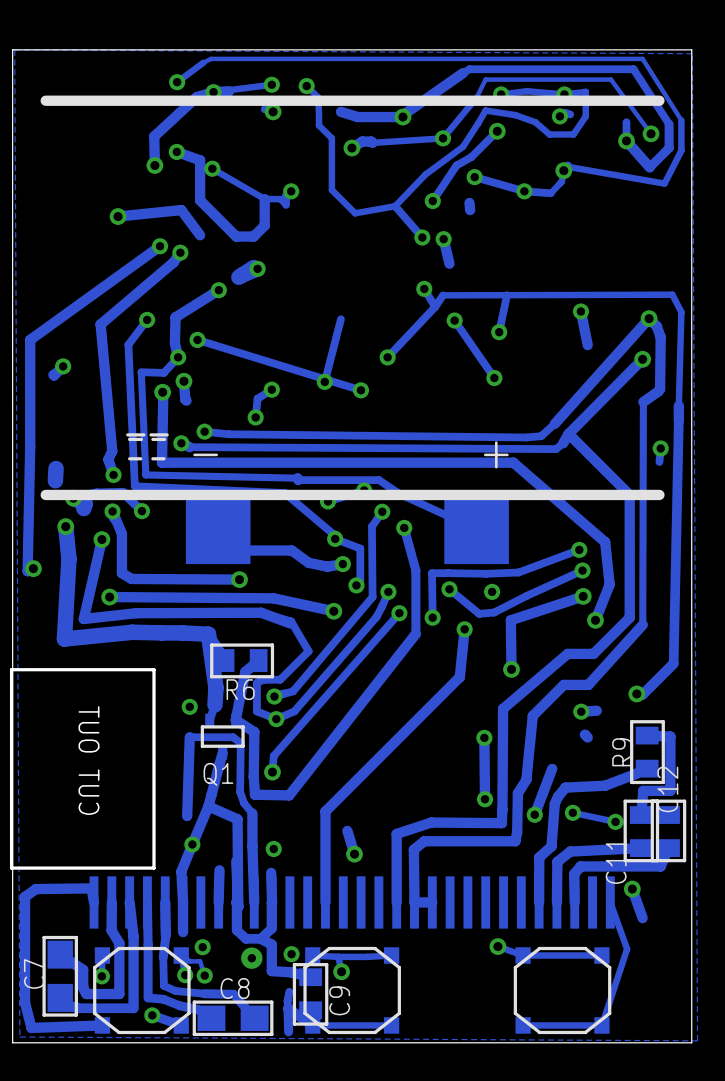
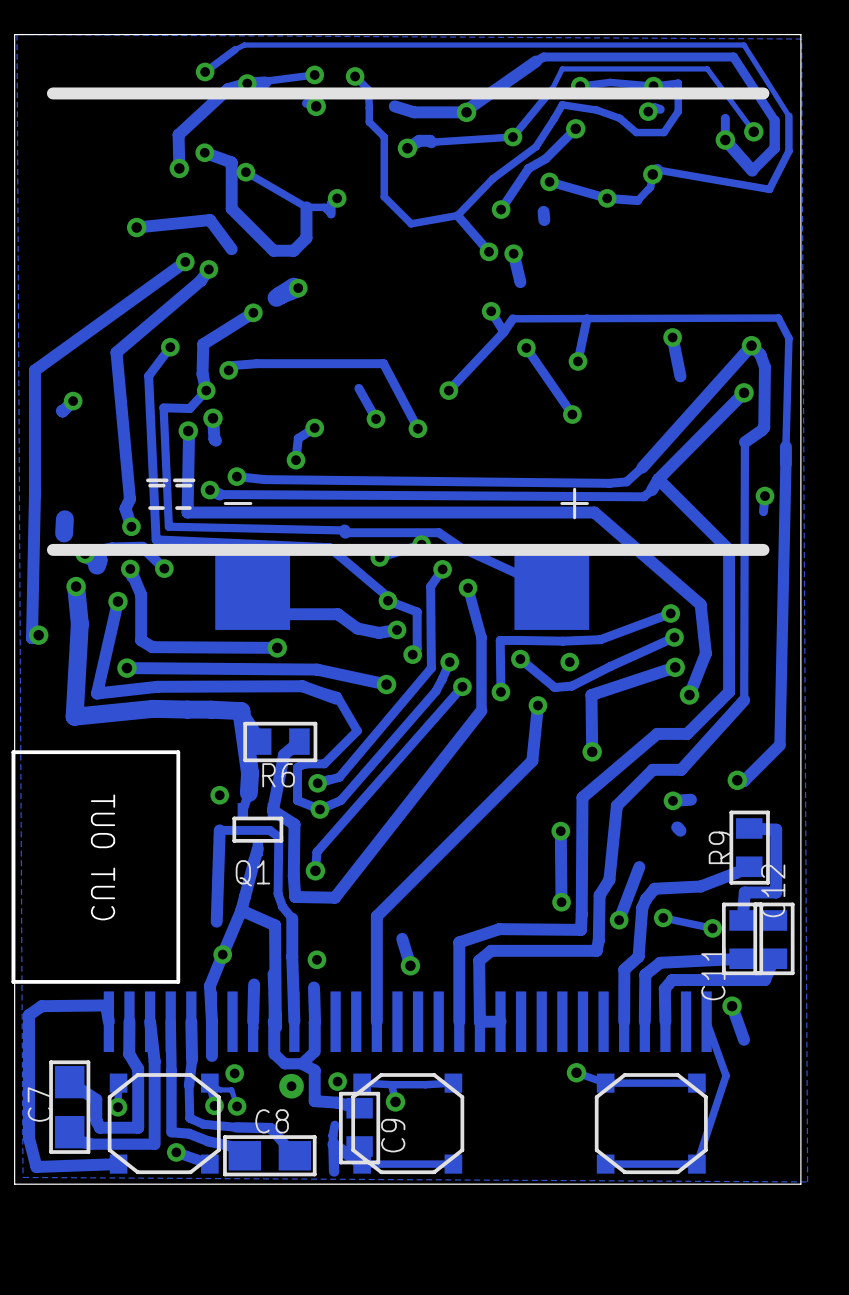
track: (340, 319) (324, 381) -> (358, 388) (376, 419)
track: (197, 339) (360, 390) -> (227, 365) (257, 363) (383, 363) (417, 428)

